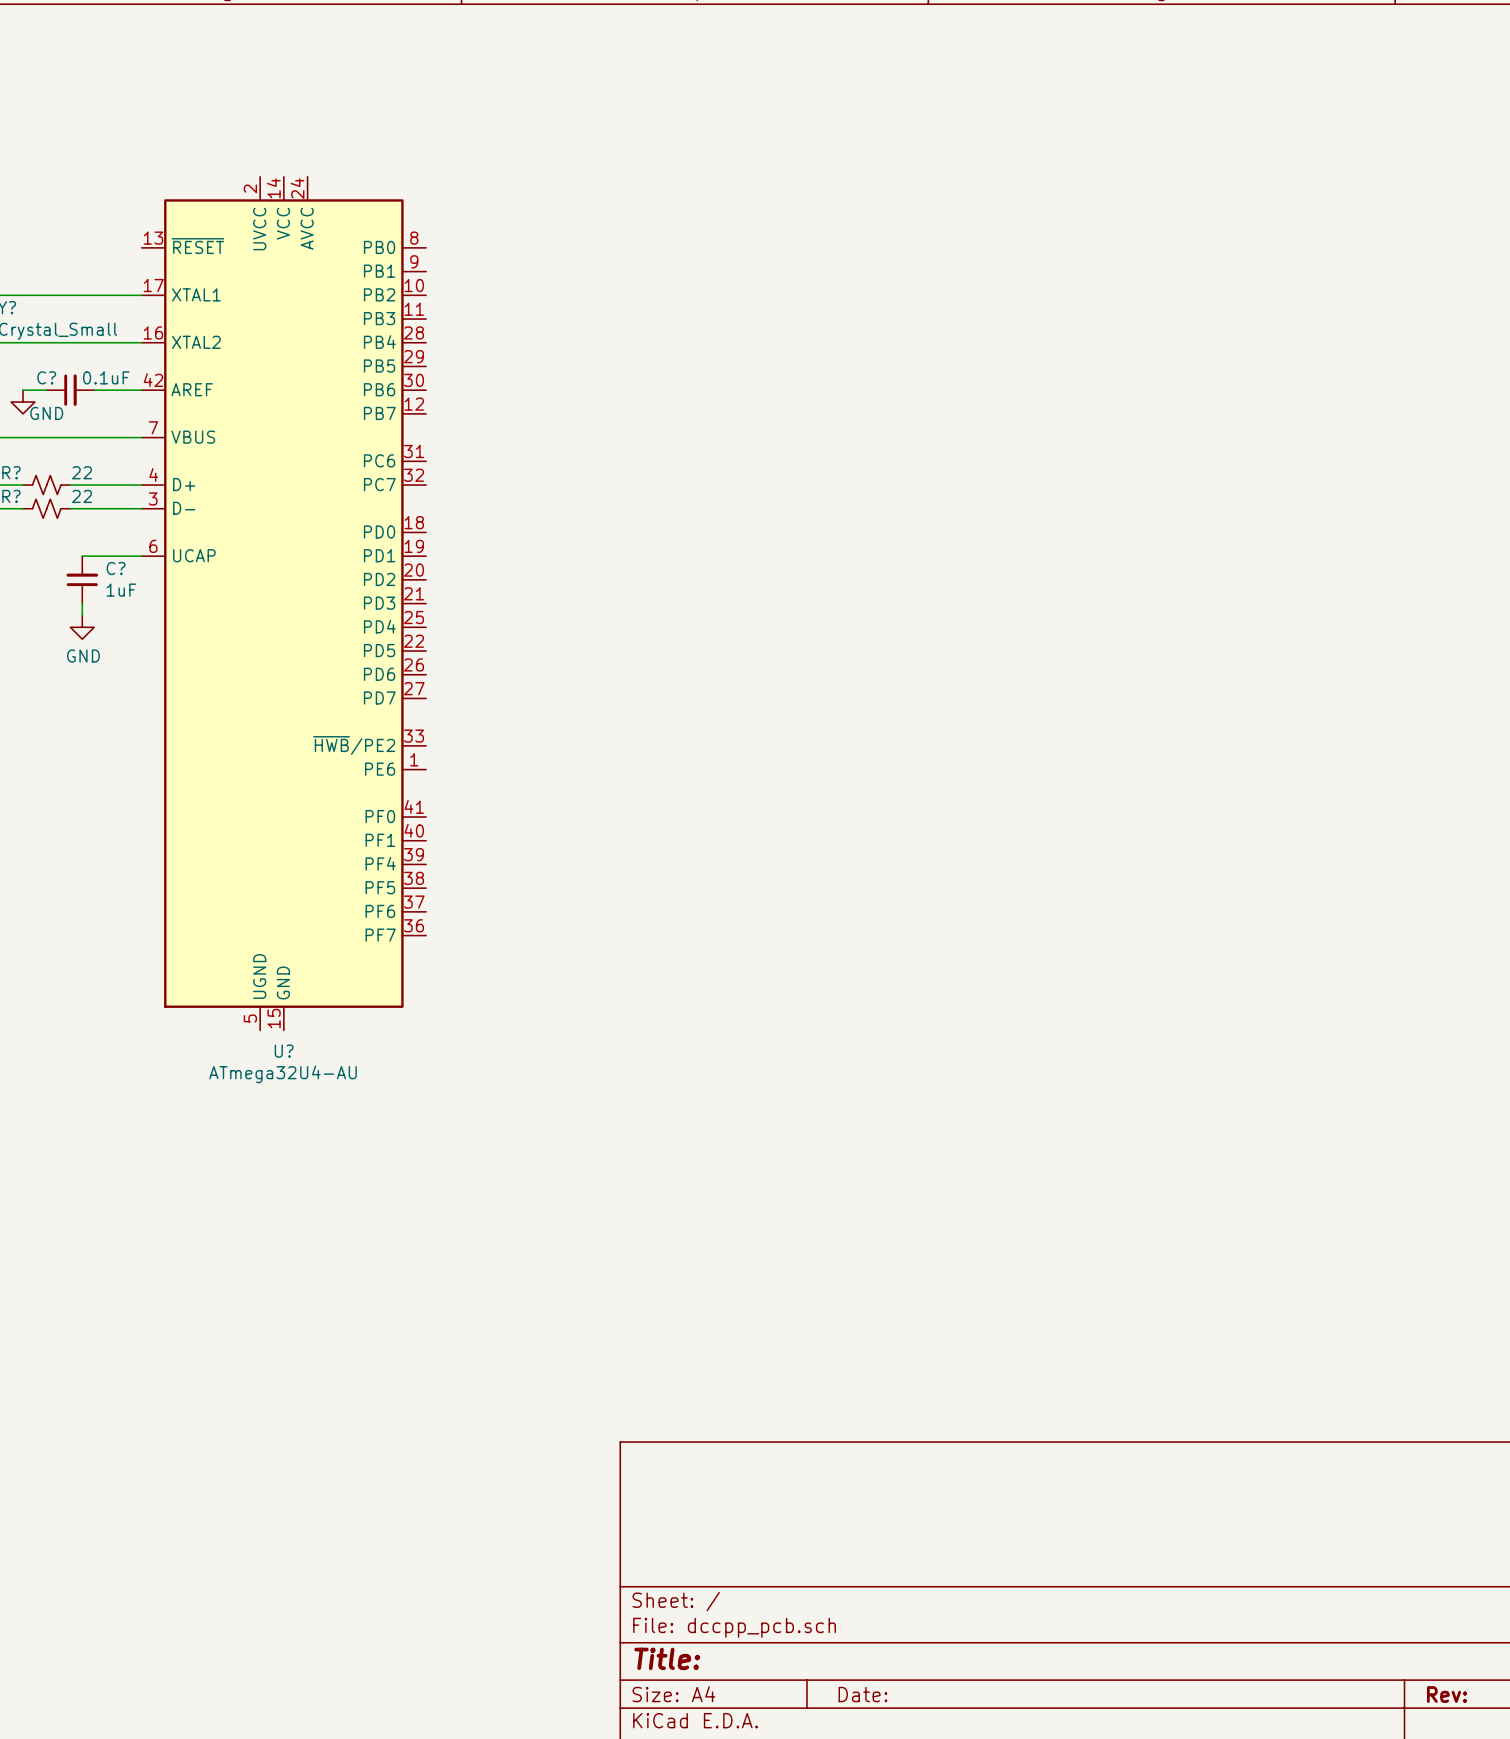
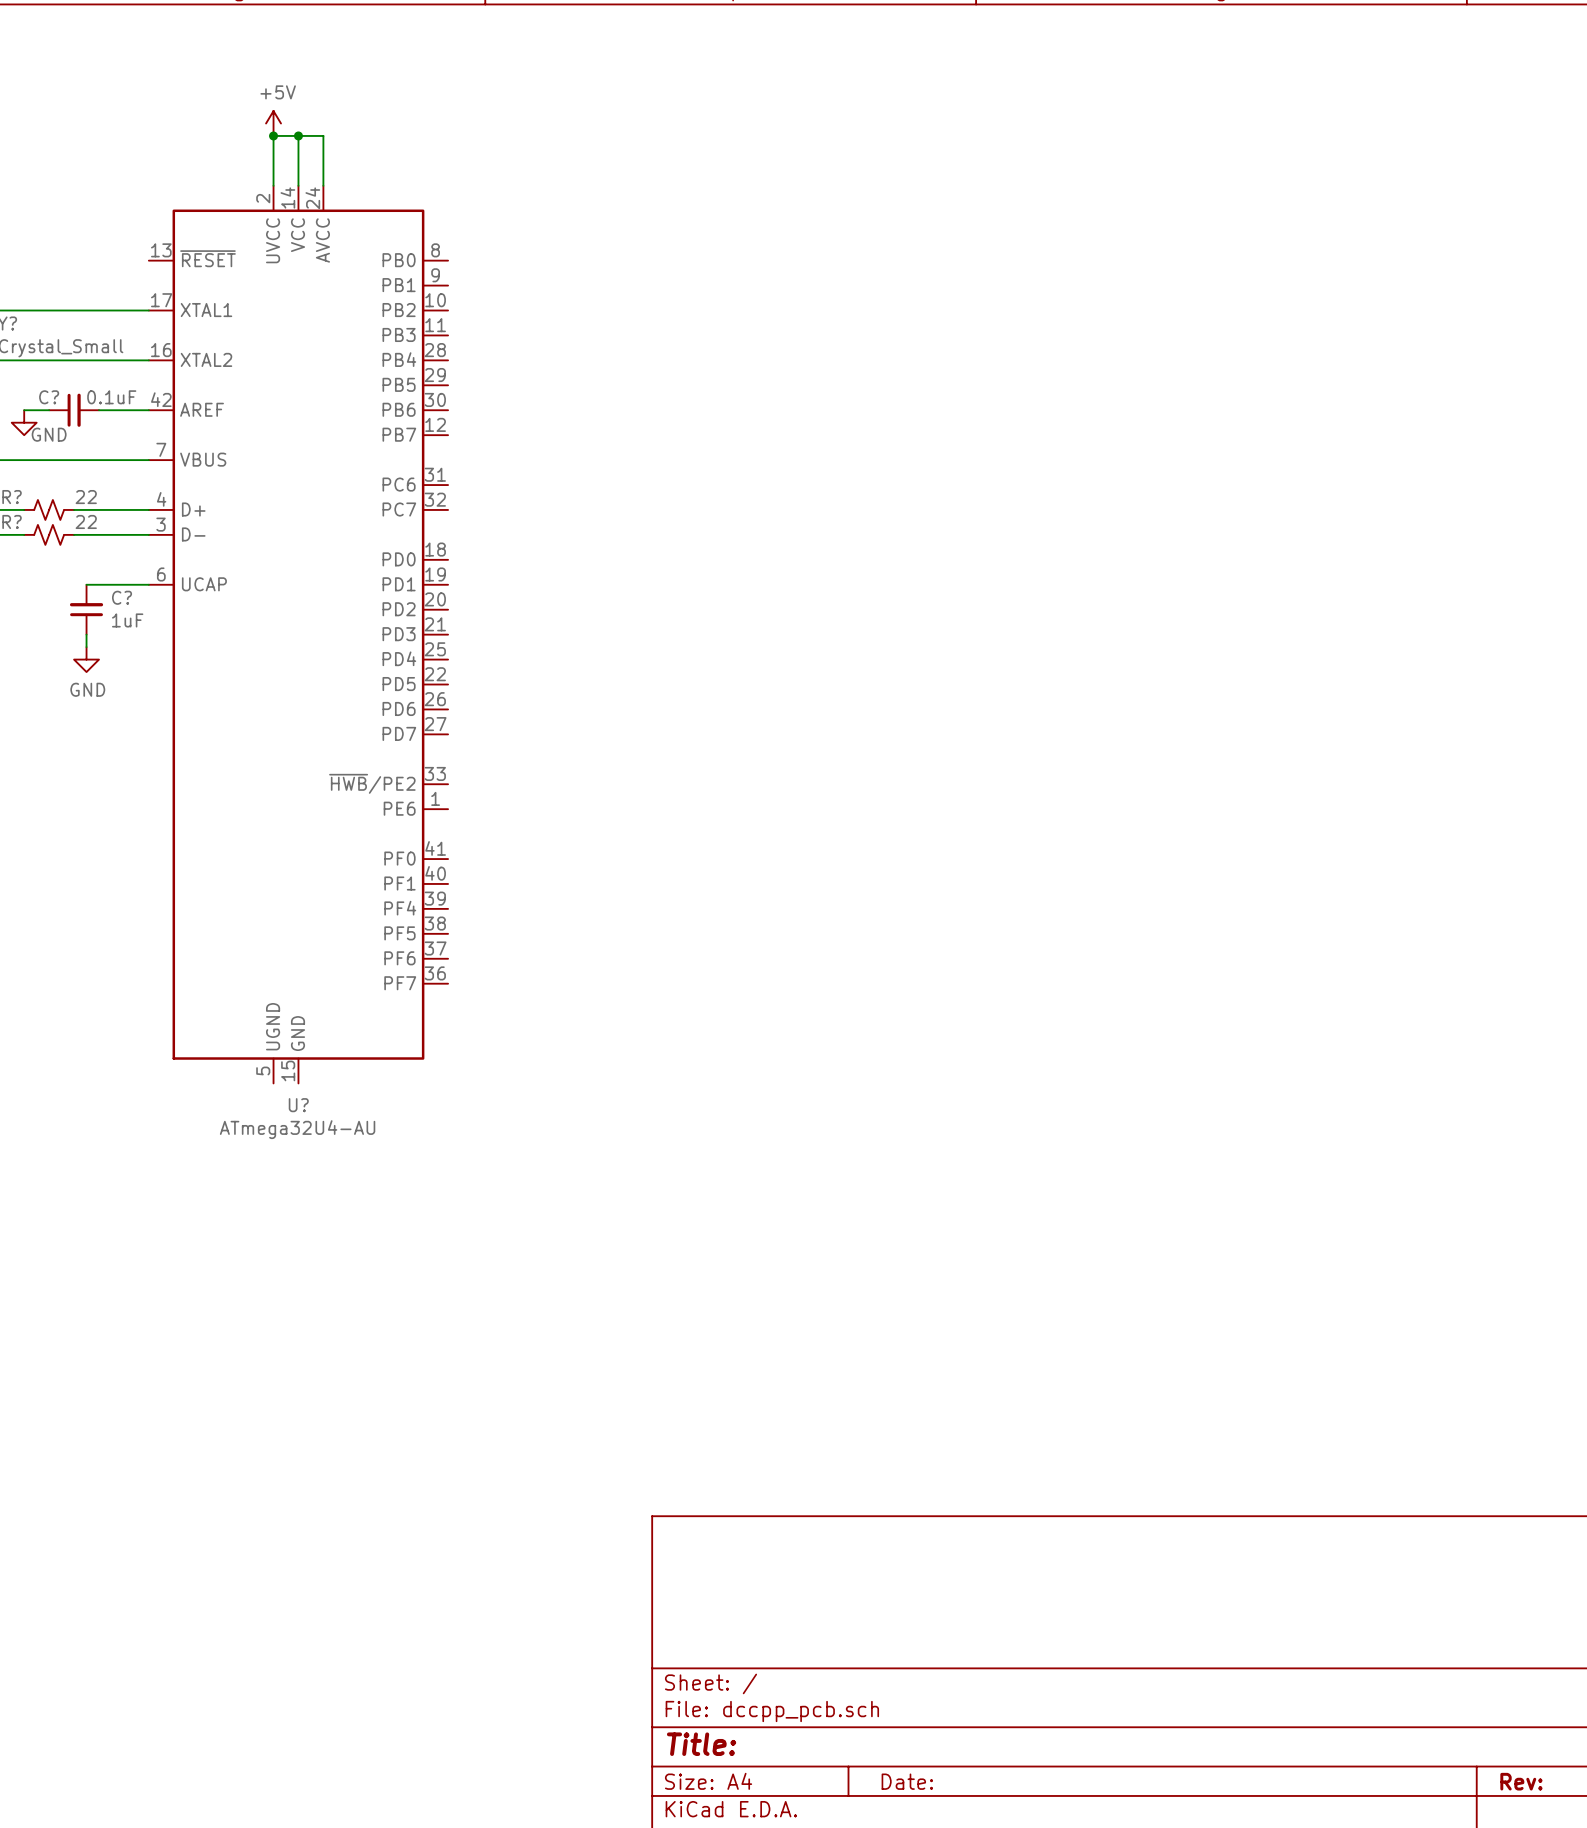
power symbol: none -> +5V (273, 123)
junction: none -> (273, 135)
wire: none -> (298, 135) (298, 185)
junction: none -> (298, 135)
wire: none -> (273, 185) (273, 135) (323, 135) (323, 185)

